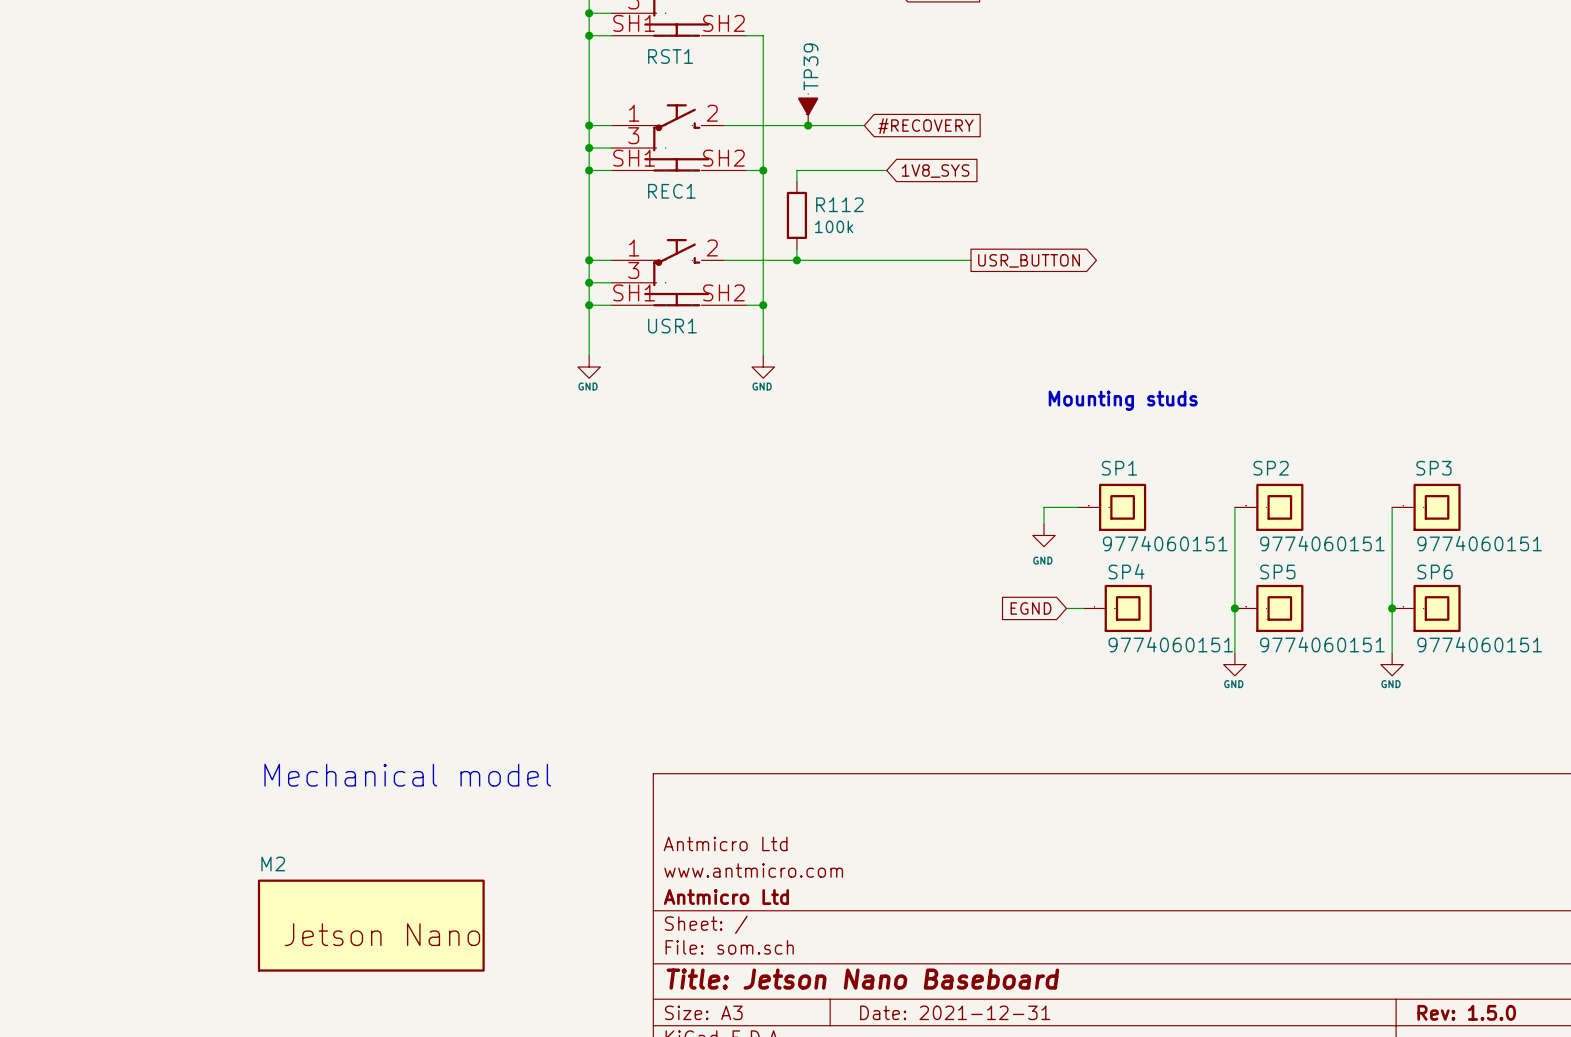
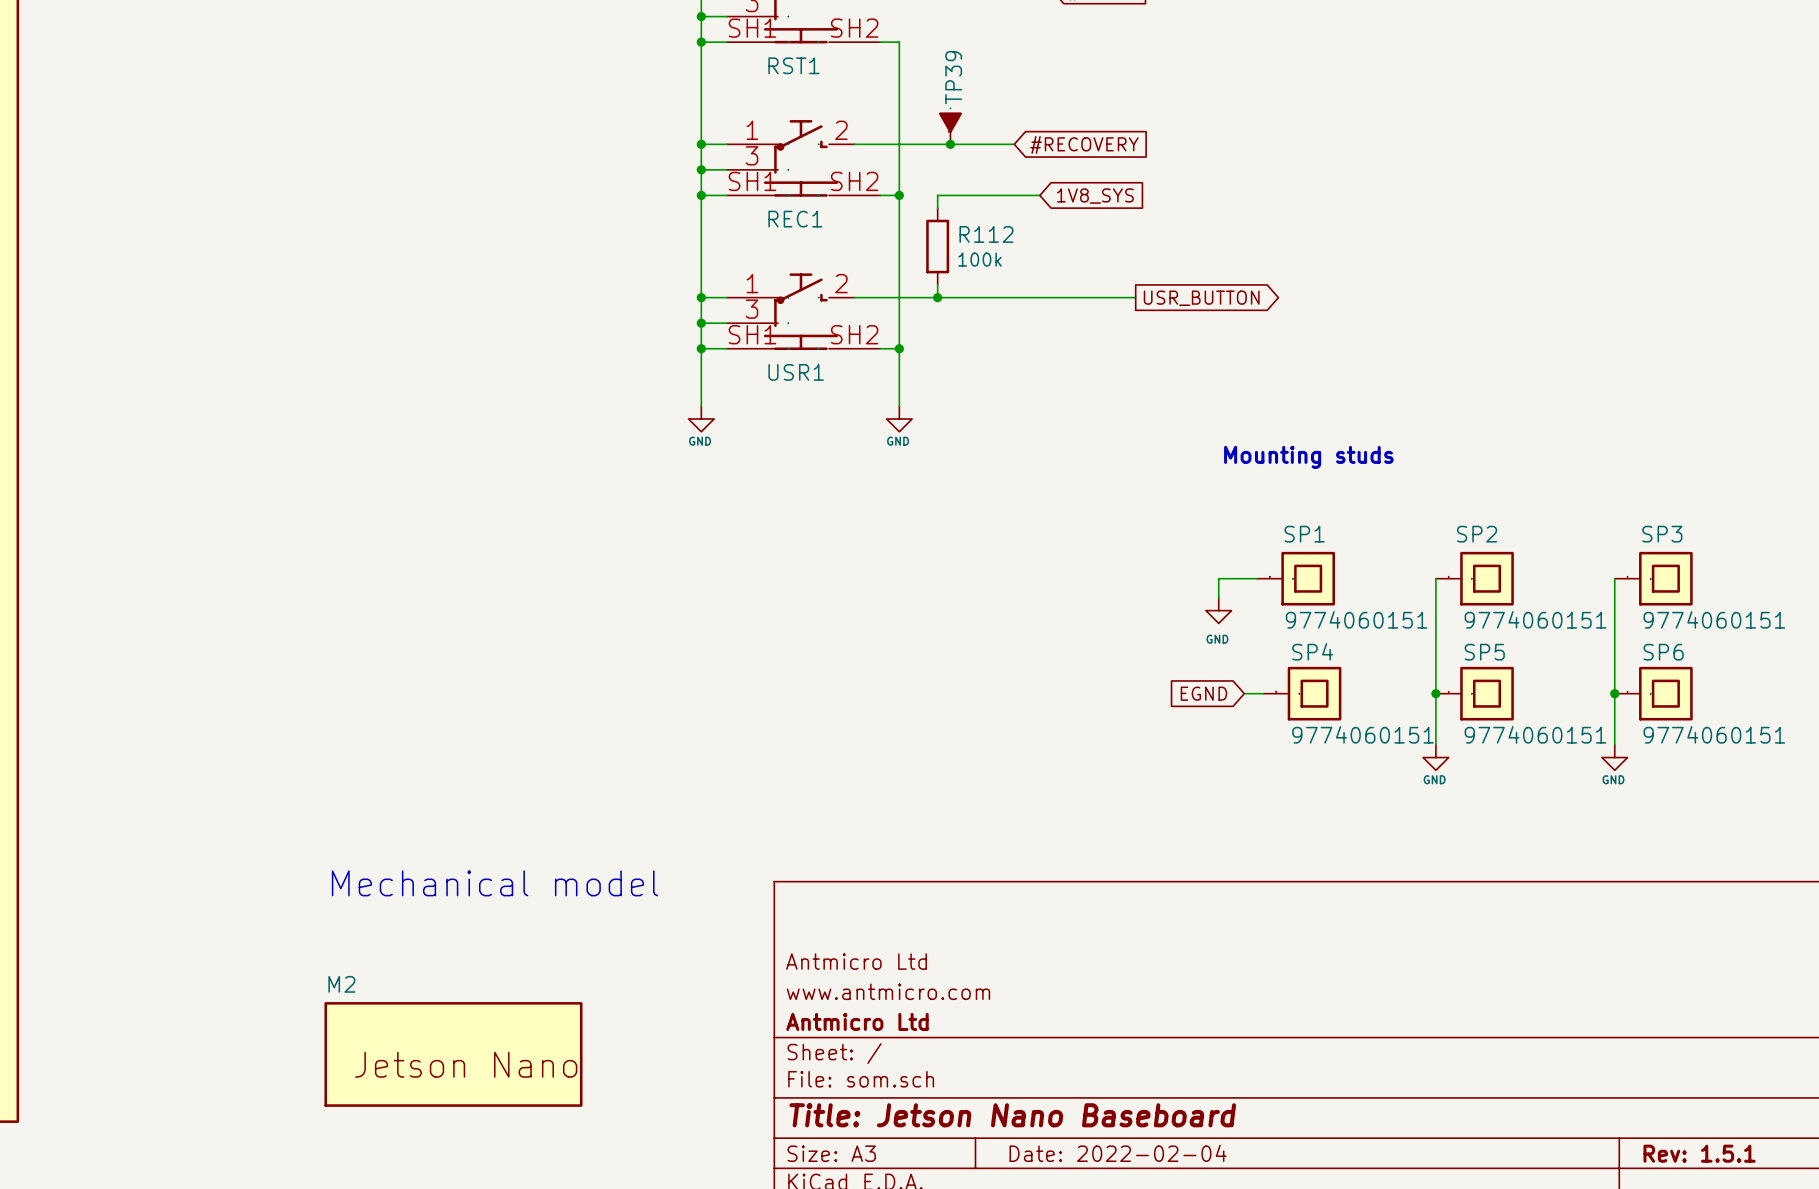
title block: Date: 2021-12-31 (955, 1012) -> Date: 2022-02-04 (1118, 1153)
title block: Rev: 1.5.0 (1466, 1012) -> Rev: 1.5.1 (1699, 1153)

